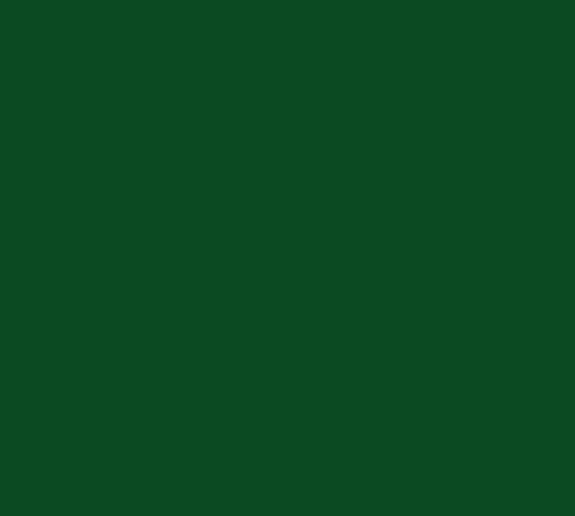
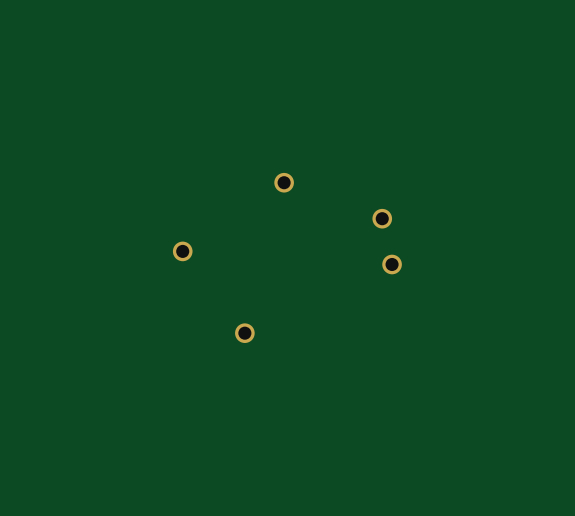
via: none -> (284, 182)
via: none -> (382, 218)
via: none -> (182, 251)
via: none -> (392, 264)
via: none -> (244, 333)

